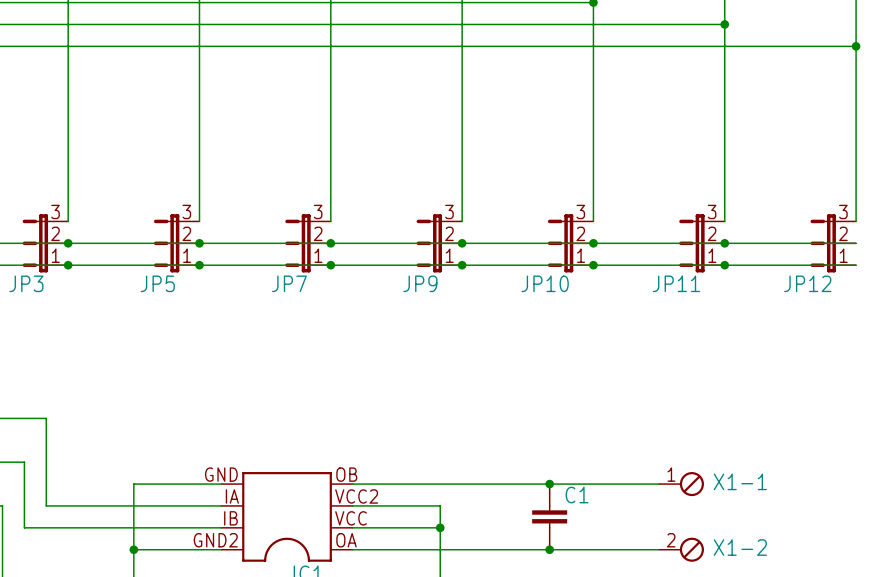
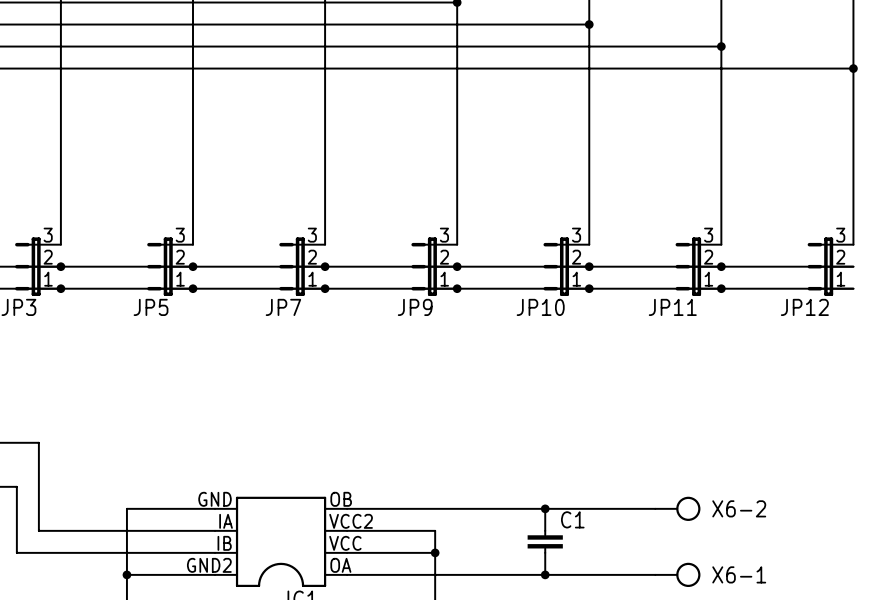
X1-1: (681, 484) -> none
X6-2: none -> (677, 508)
X1-2: (681, 549) -> none
X6-1: none -> (677, 574)

